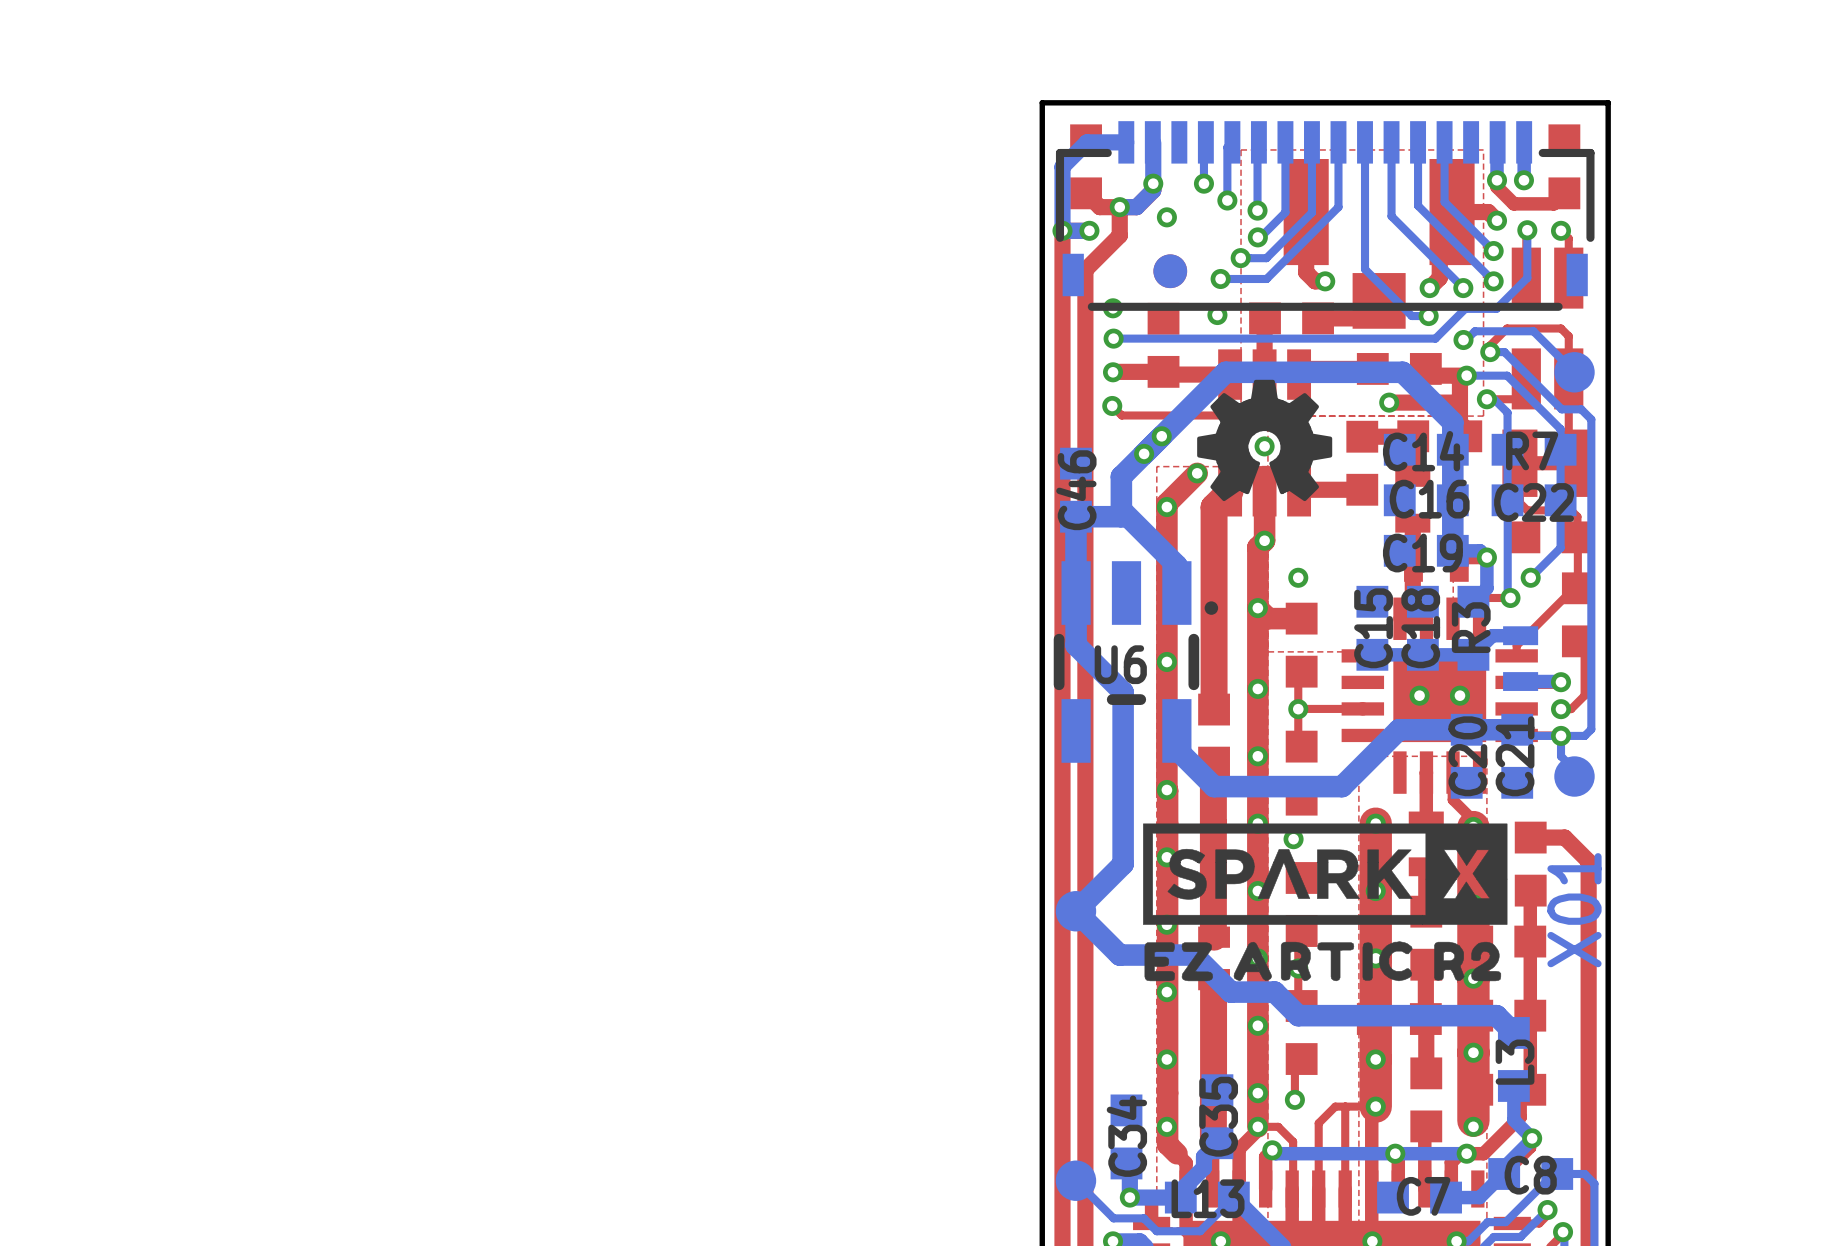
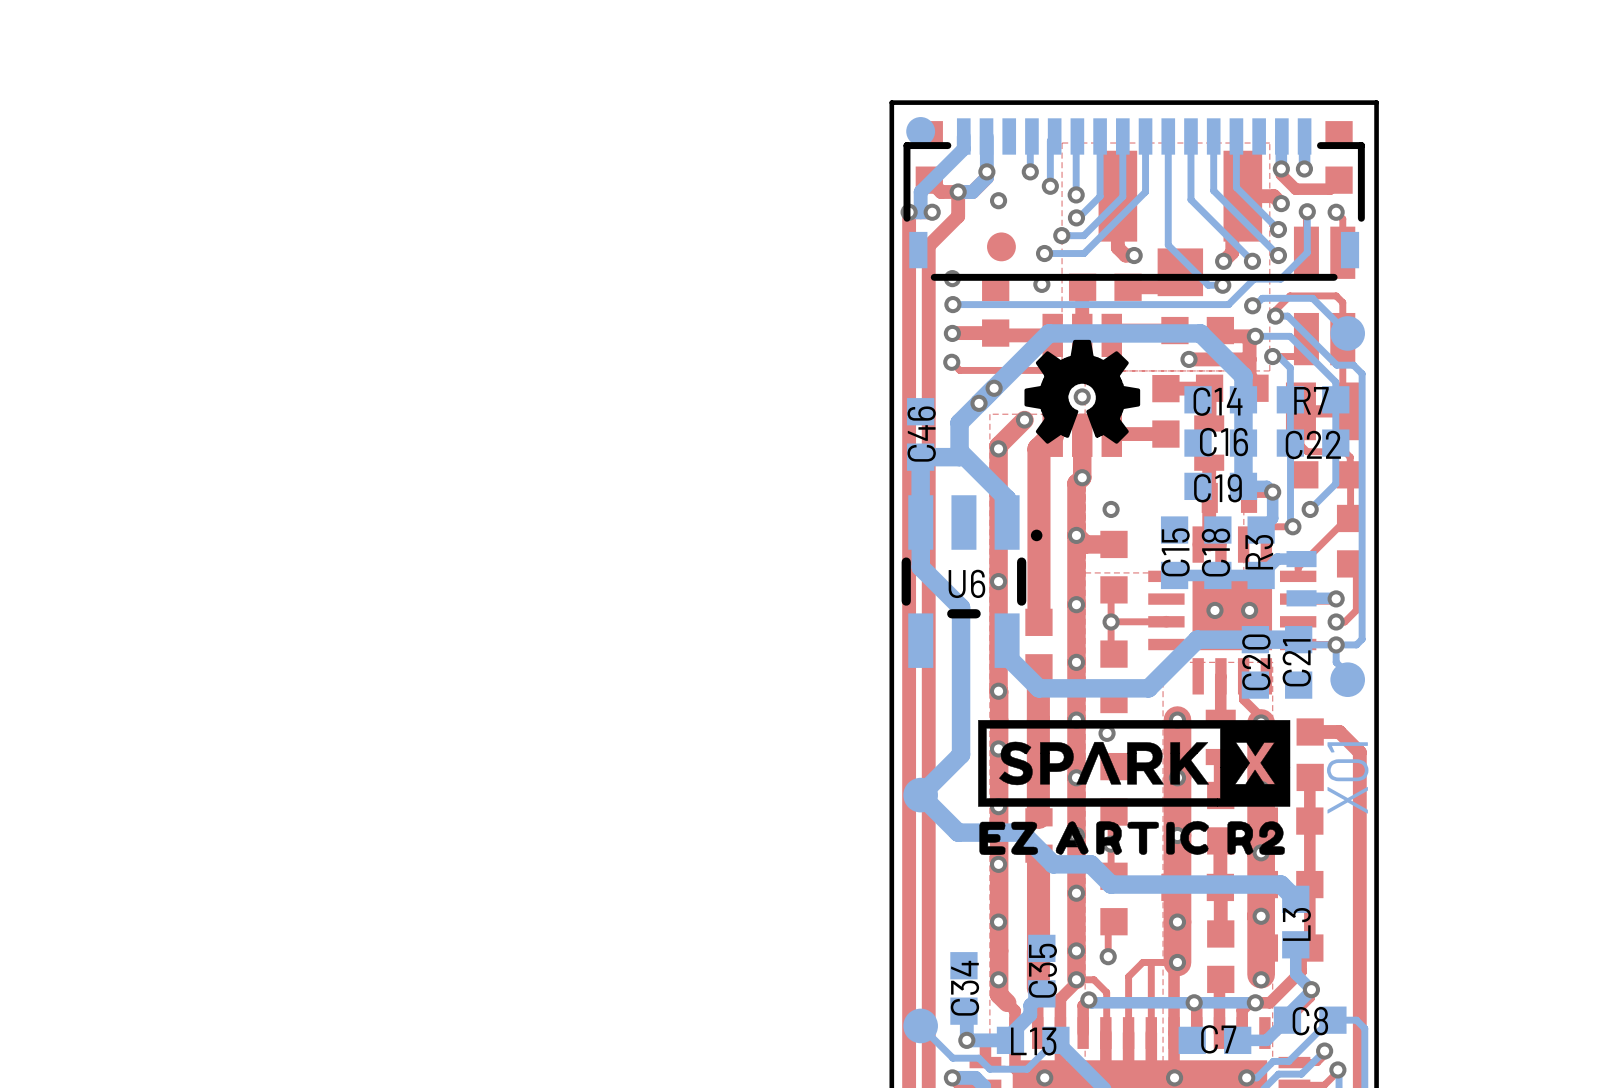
bottom track: (1126, 142) (1086, 142) (1062, 166) (1062, 230) -> (963, 136) (963, 148) (920, 192) (920, 212)
part position: (1170, 271) -> (920, 131)

